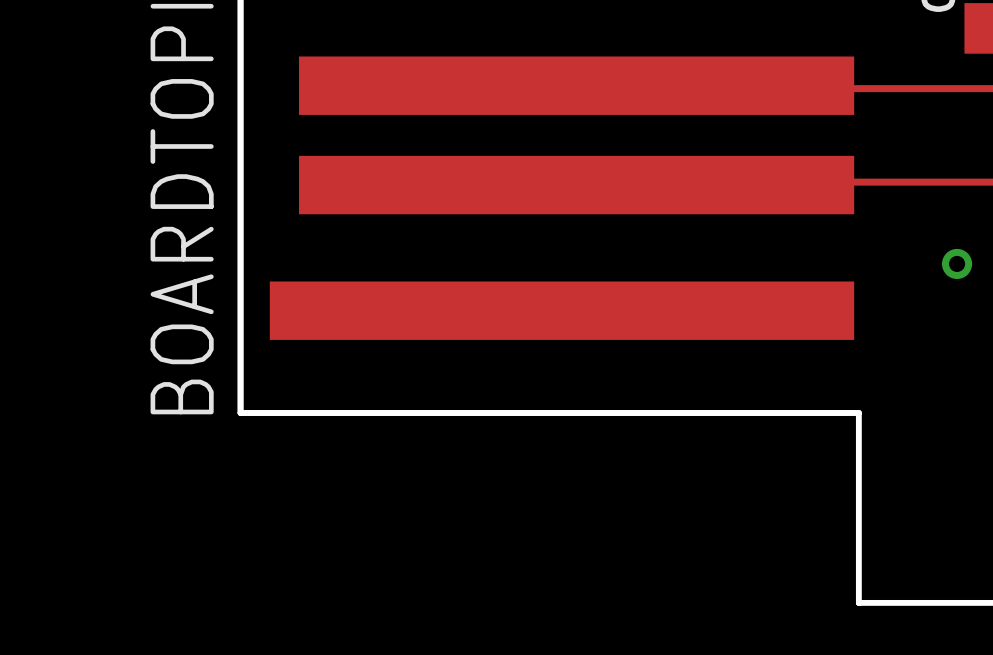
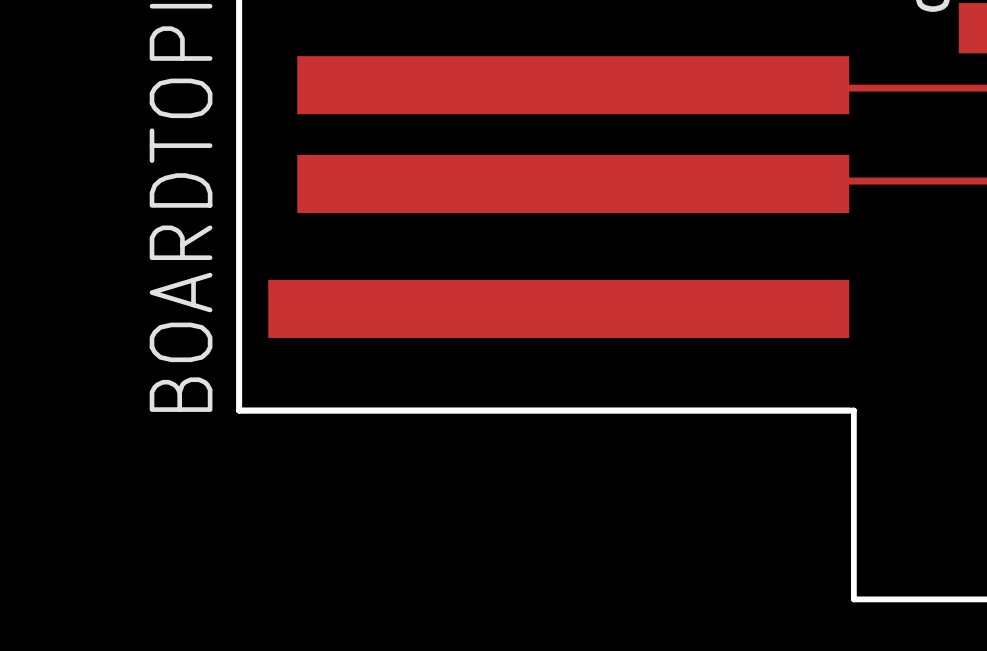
via: (957, 263) -> none

